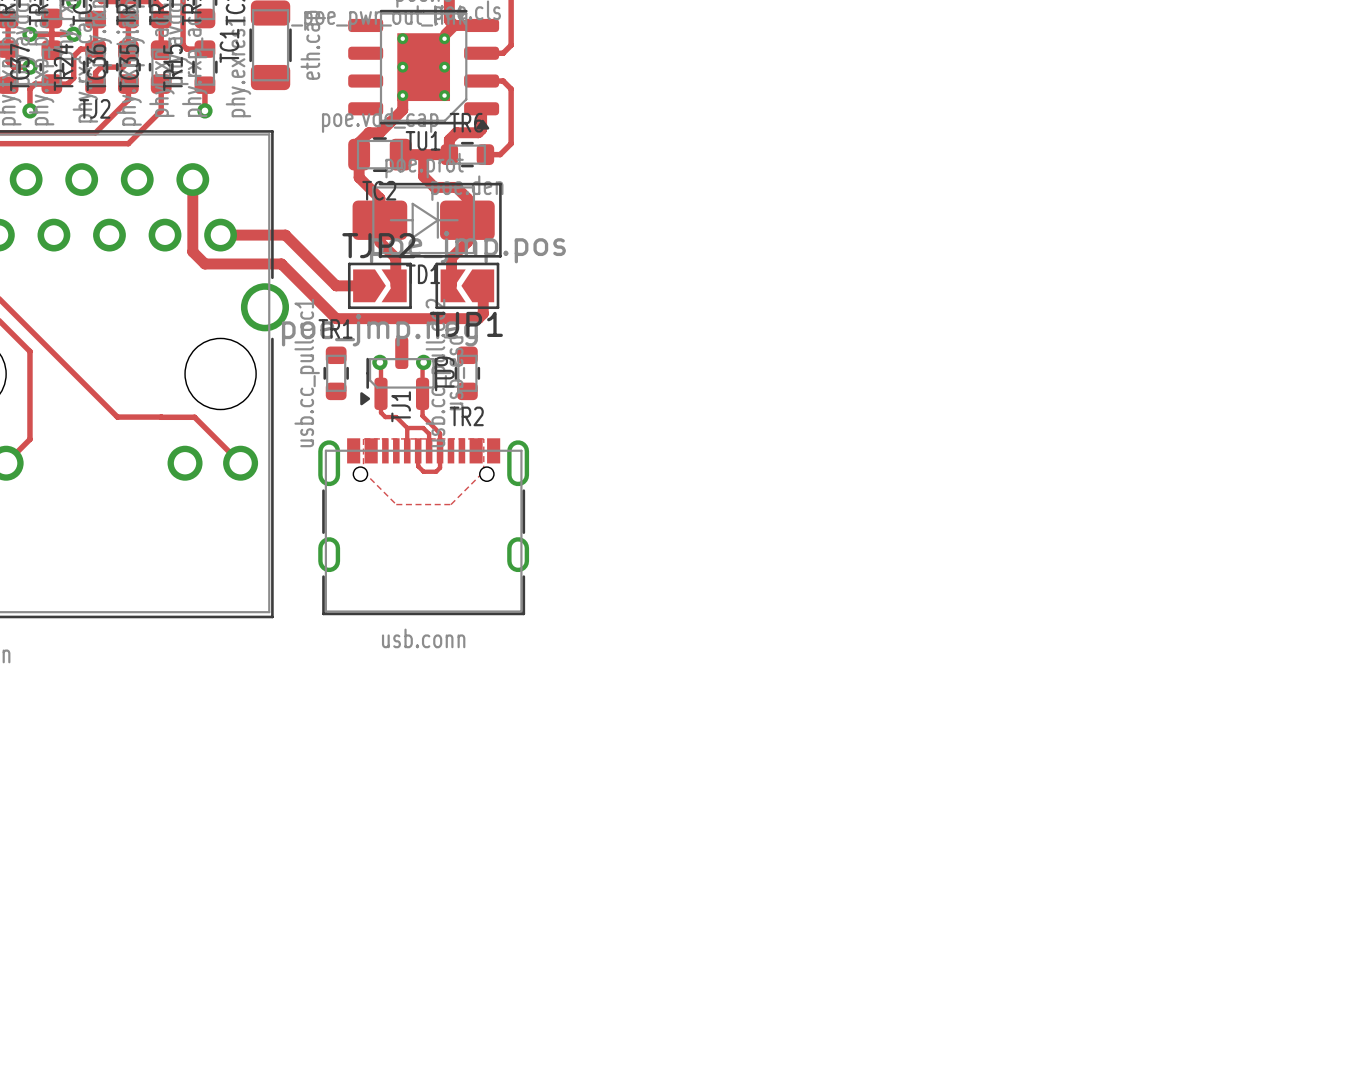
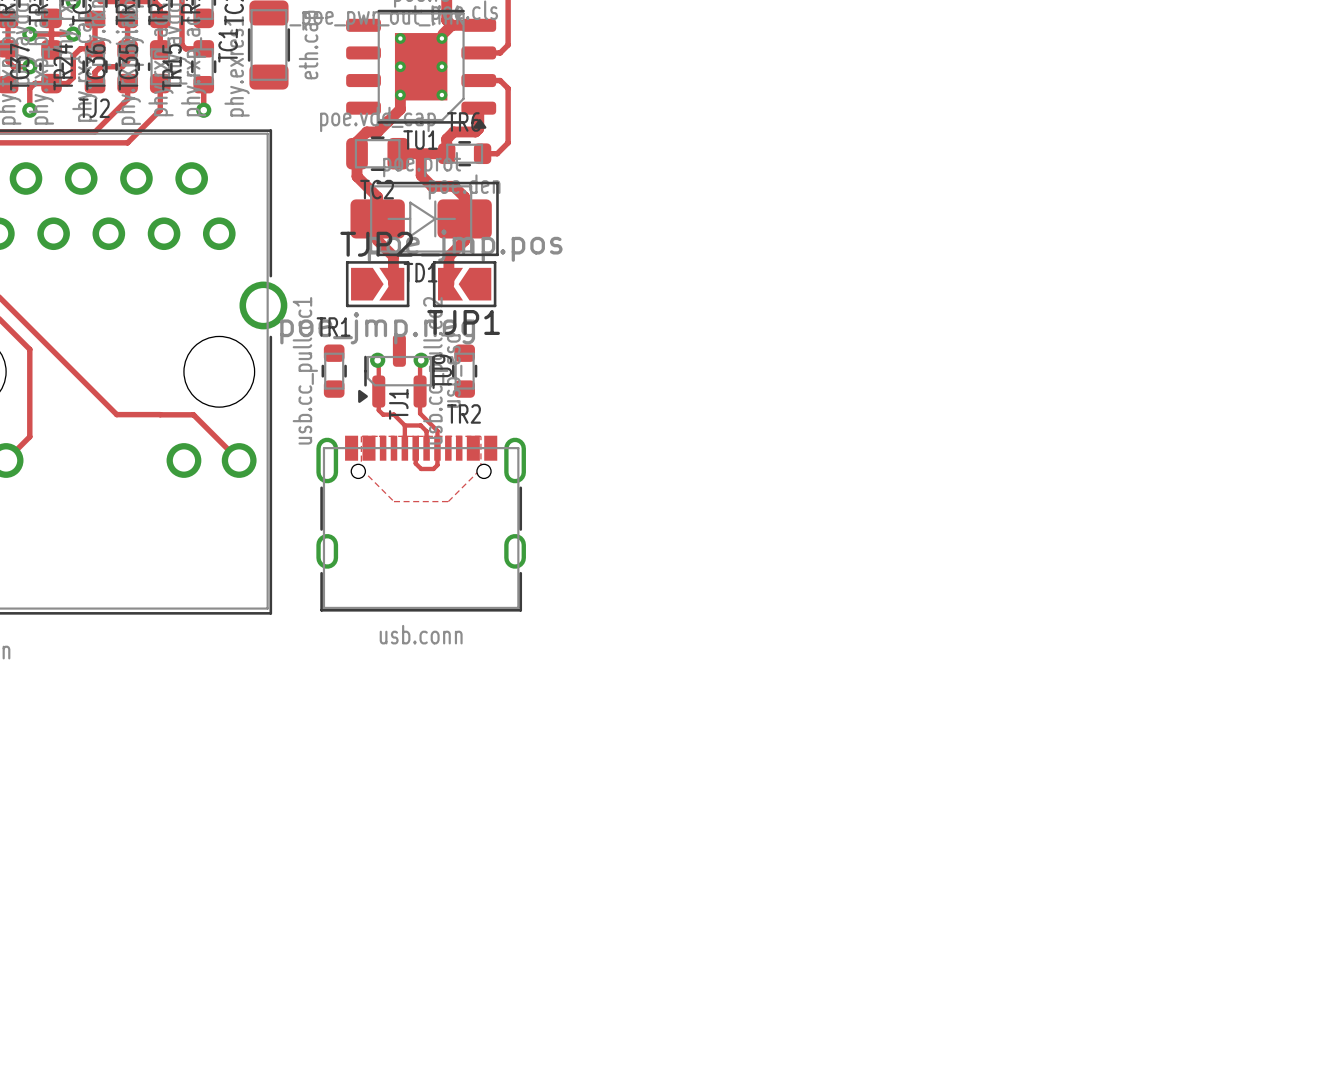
track: (192, 179) (192, 251) (204, 263) (281, 263) (336, 318) (478, 318) (483, 313) (483, 285) -> none
track: (220, 235) (285, 235) (336, 285) (364, 285) -> none

